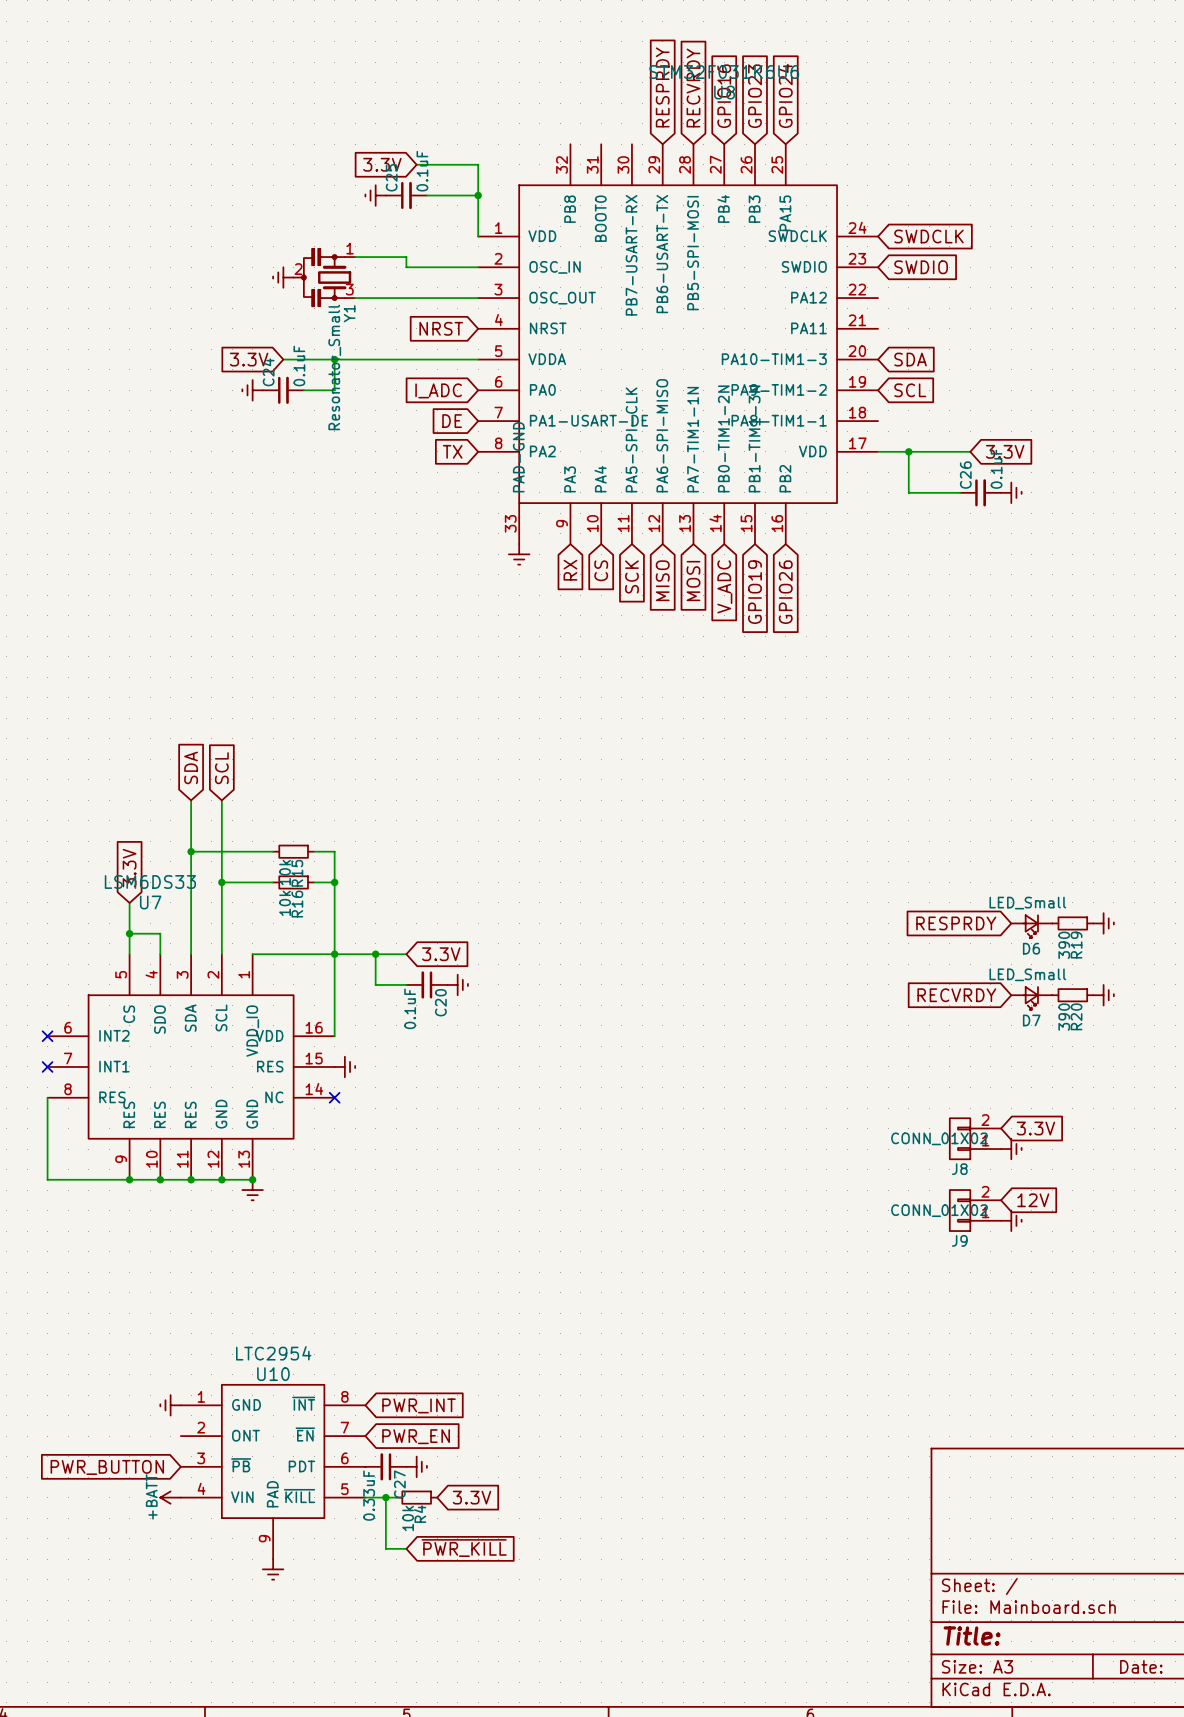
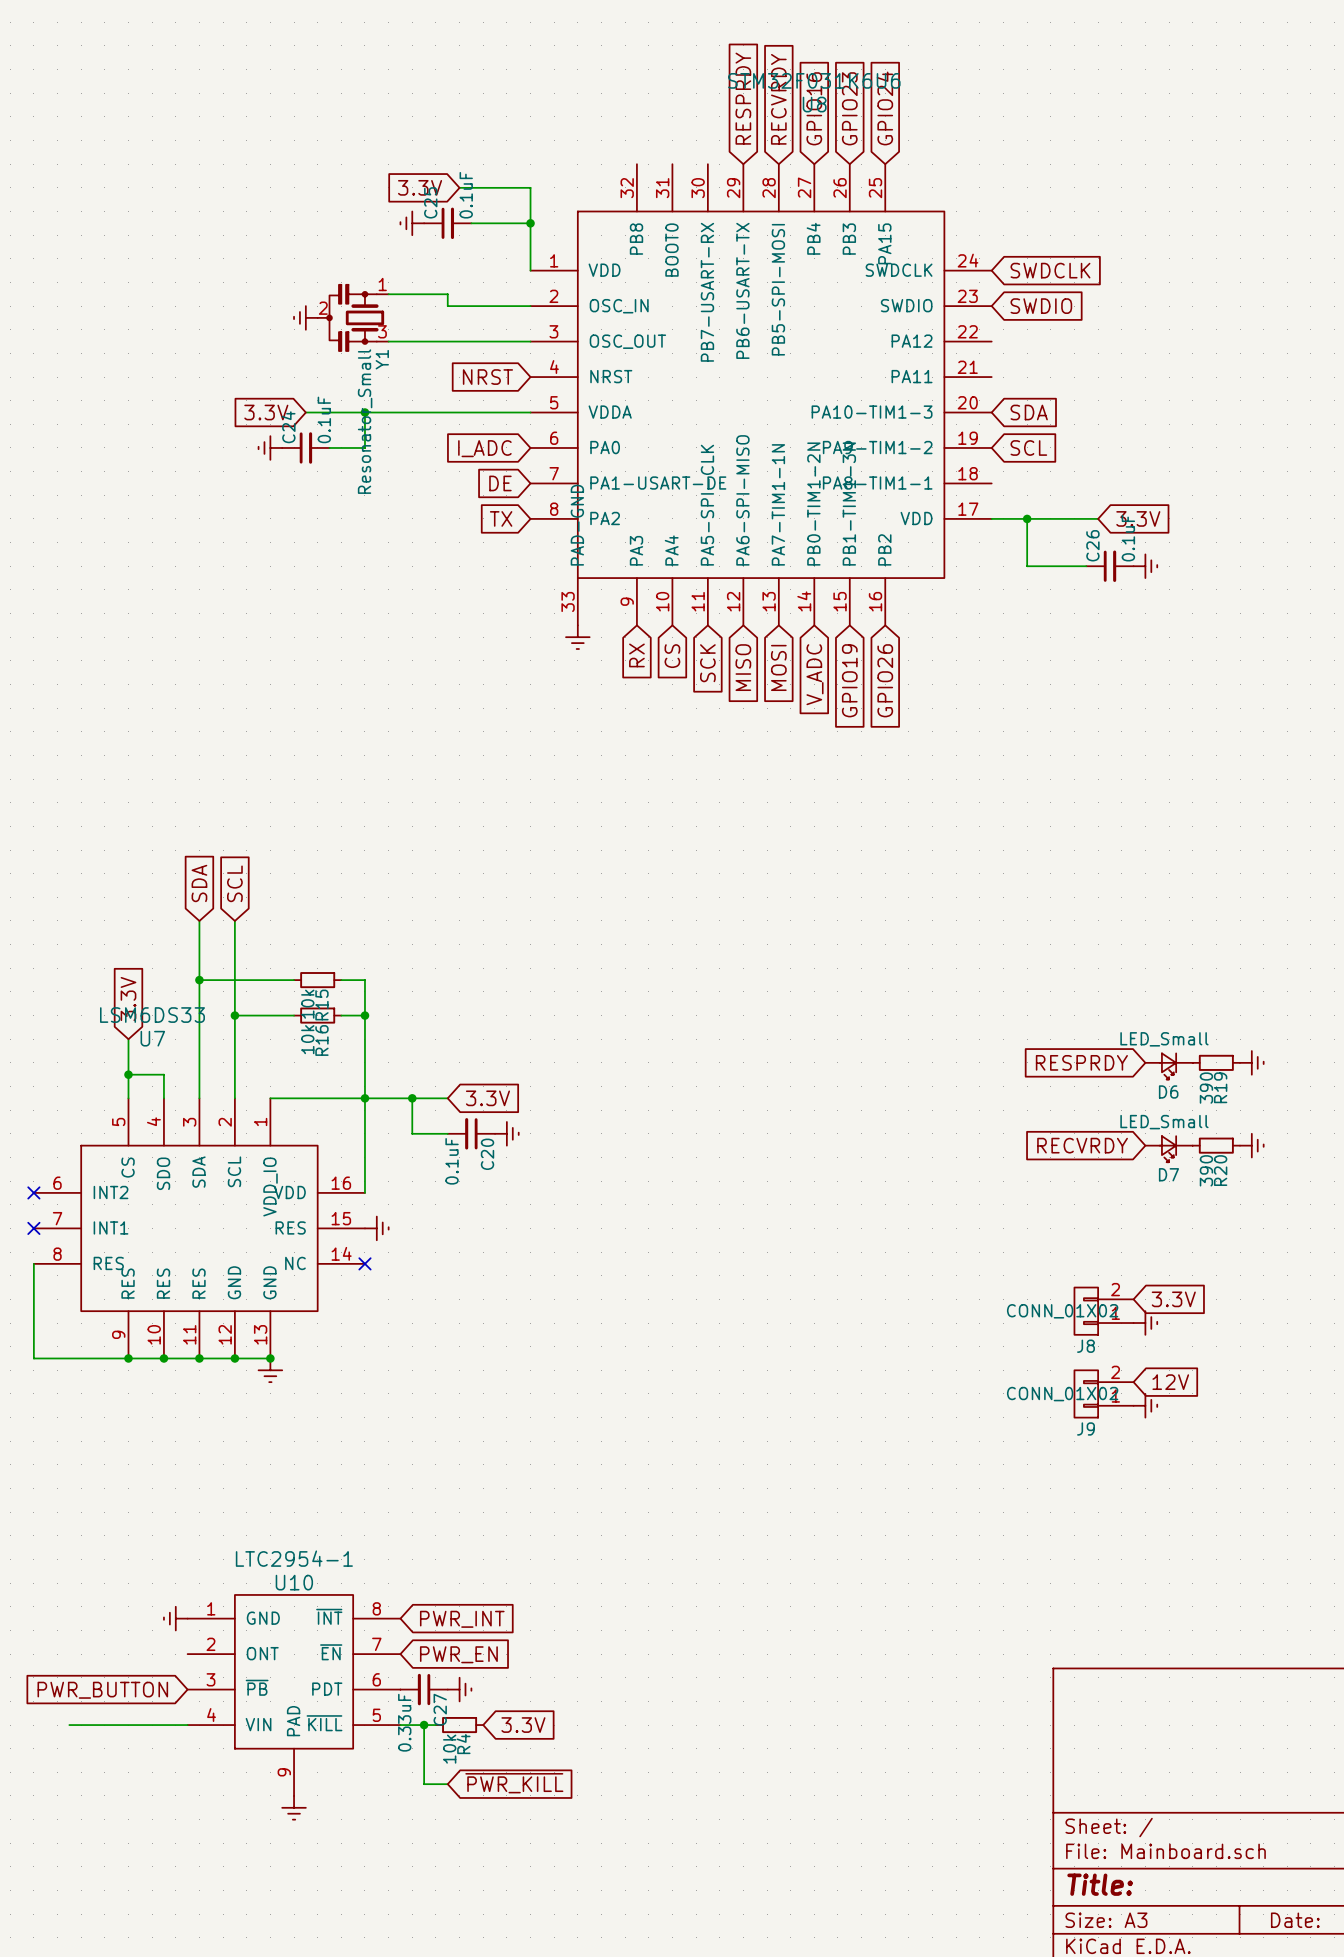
U10 value: LTC2954 (273, 1353) -> LTC2954-1 (294, 1558)
wire: none -> (69, 1725) (187, 1725)
power symbol: +BATT (170, 1497) -> none

